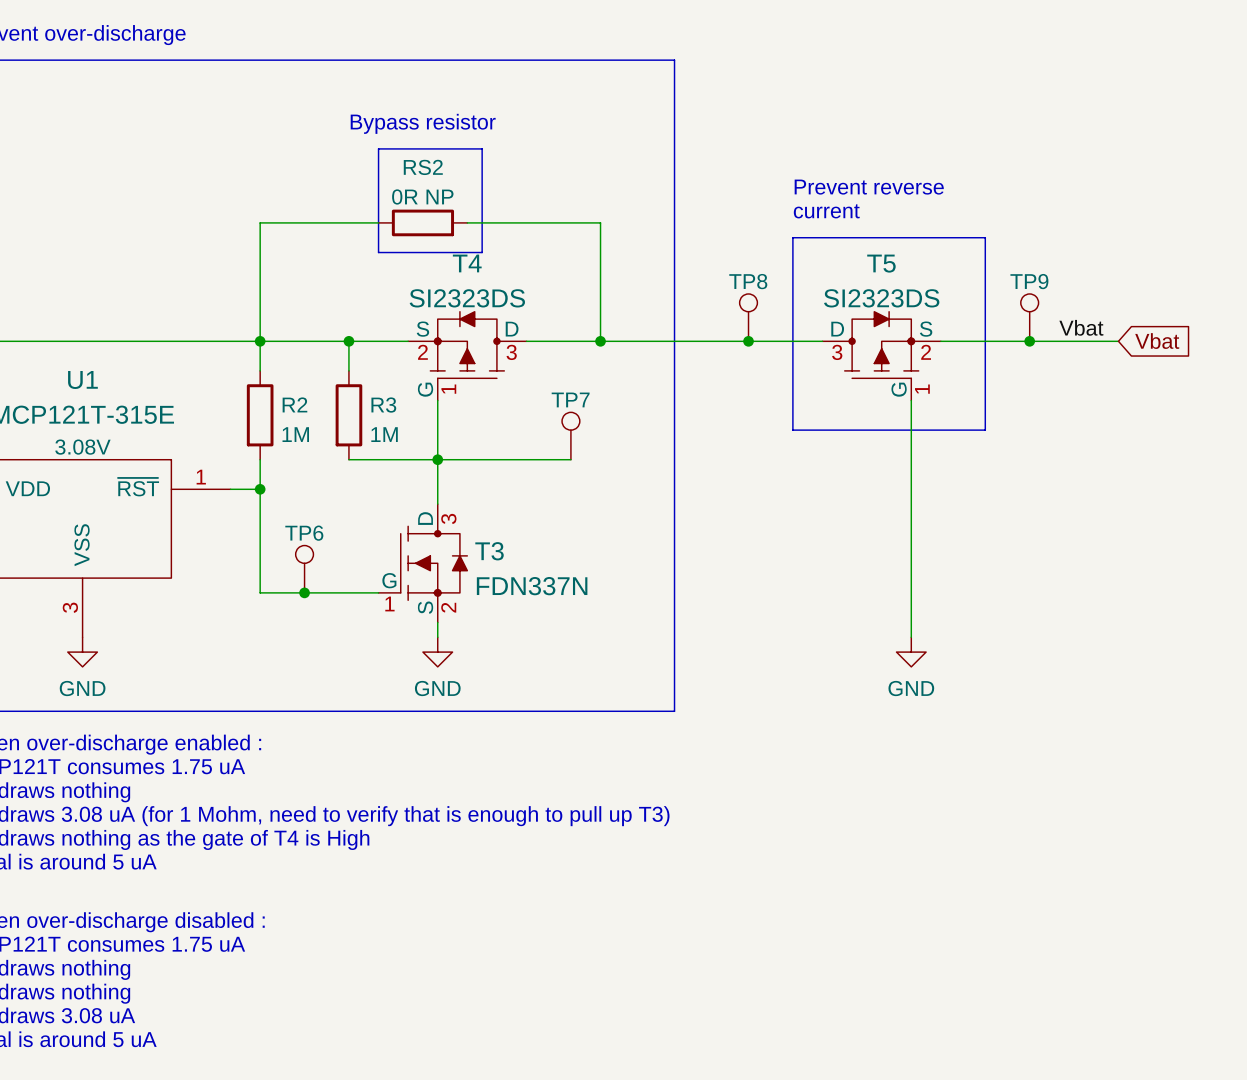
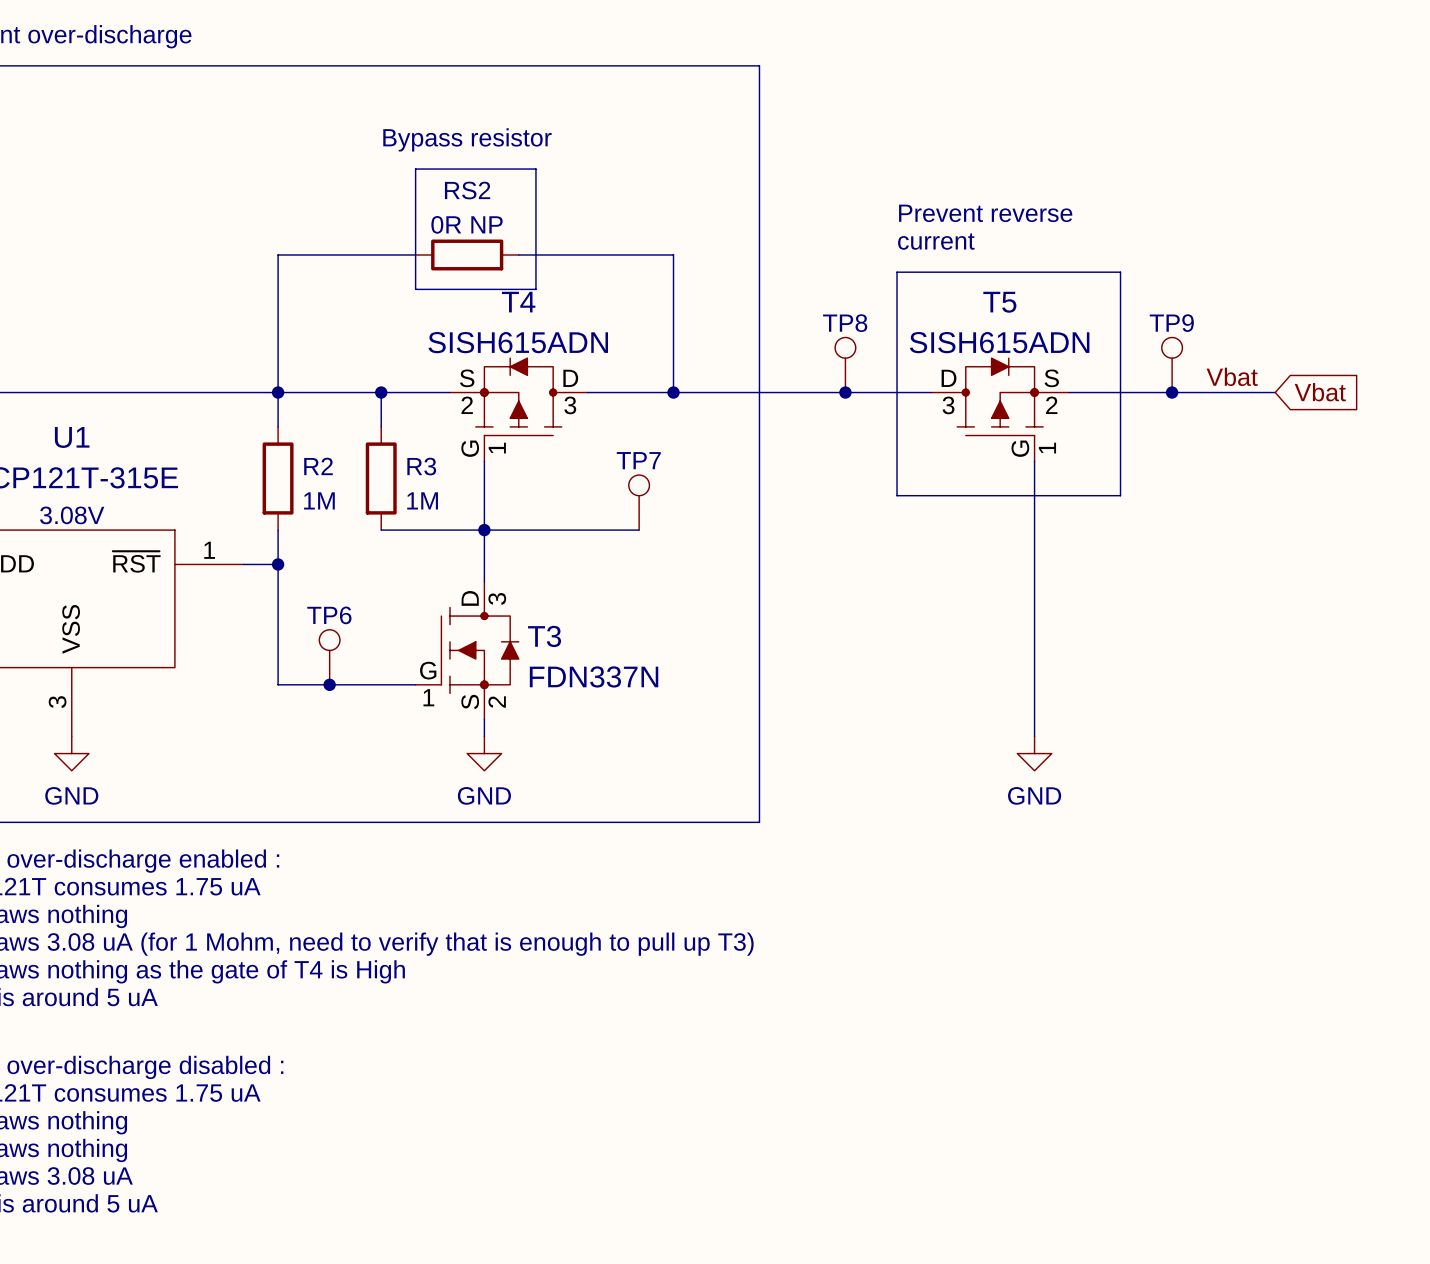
T4 value: SI2323DS (467, 298) -> SISH615ADN (518, 342)
T5 value: SI2323DS (881, 298) -> SISH615ADN (999, 342)

